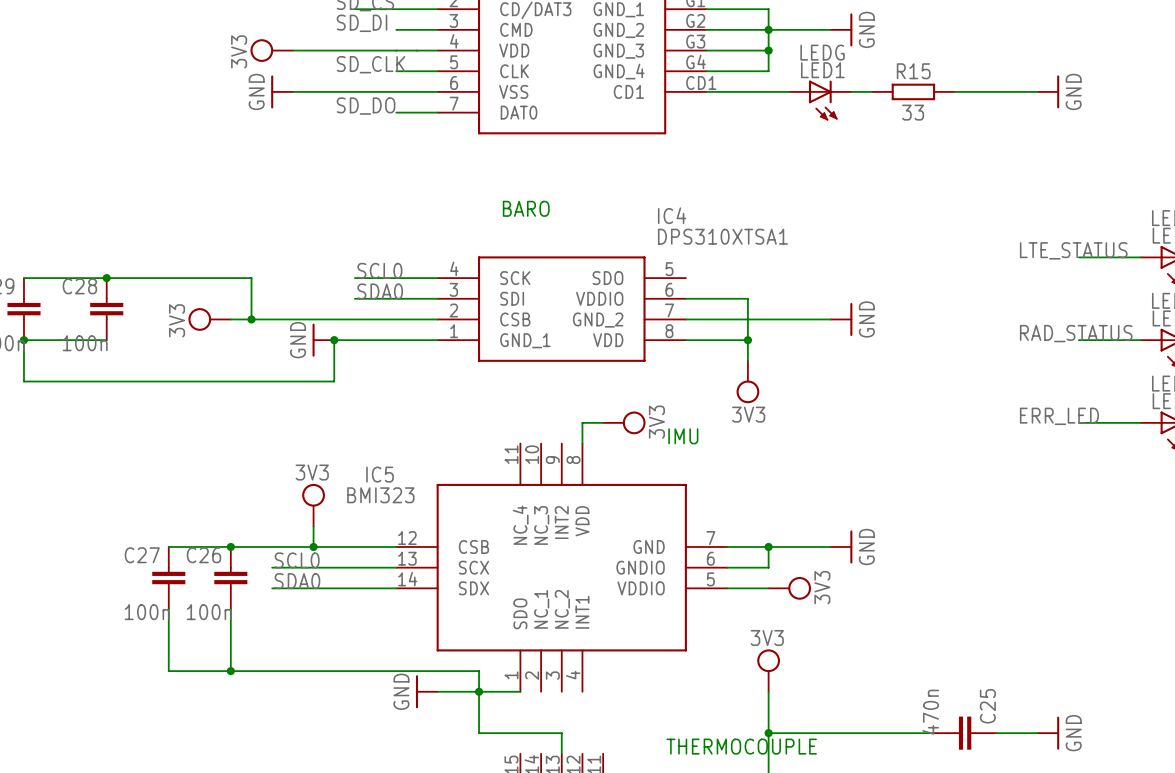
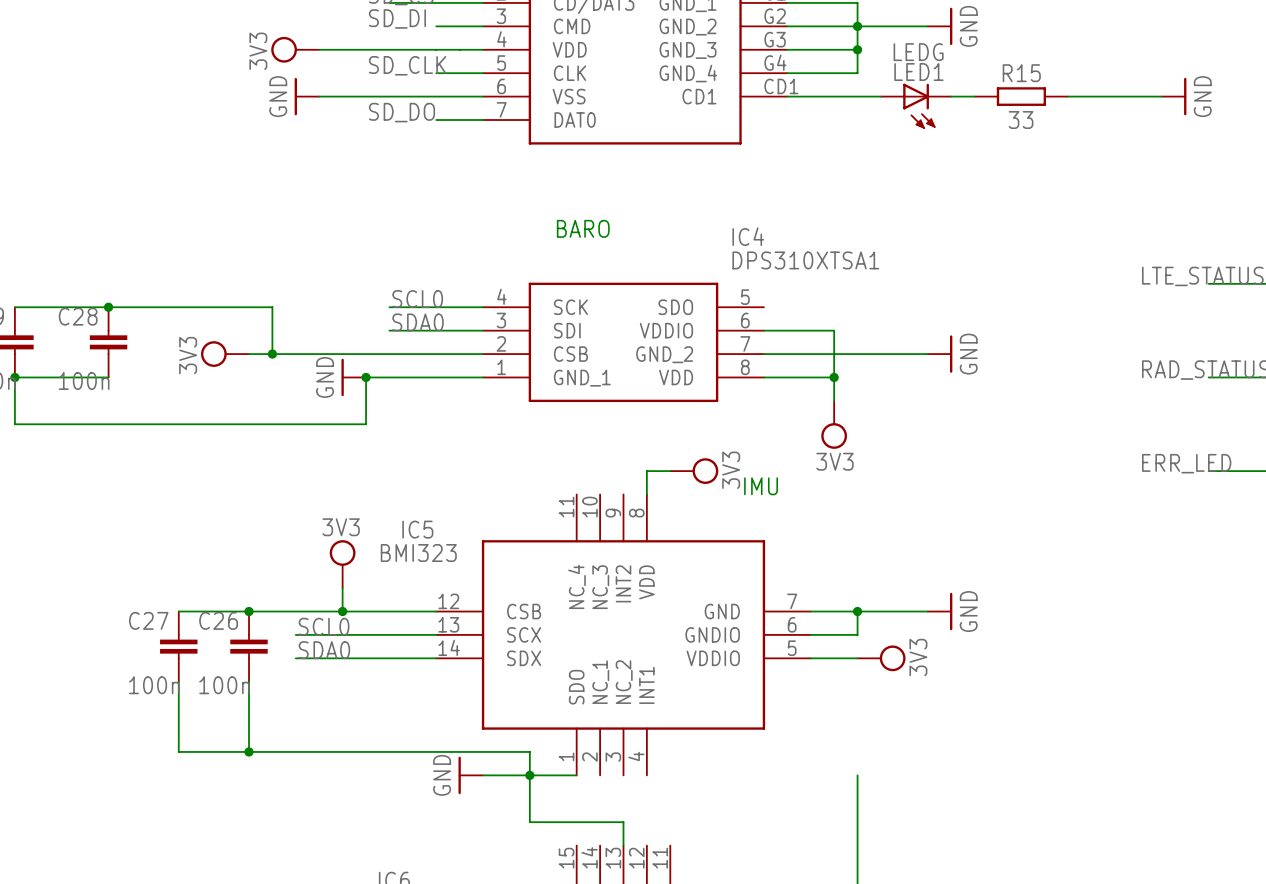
power symbol: 3V3 (768, 670) -> none
wire: (768, 733) (934, 733) -> none
junction: (768, 733) -> none
C25: 470n (965, 733) -> none
wire: (996, 733) (1037, 733) -> none
power symbol: GND (1048, 733) -> none
text: THERMOCOUPLE (741, 746) -> none

